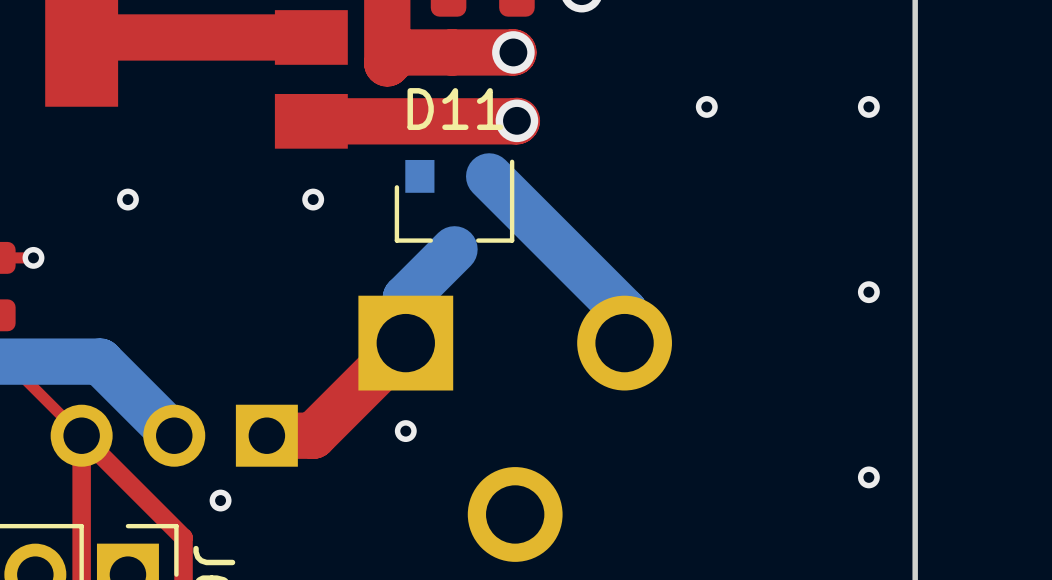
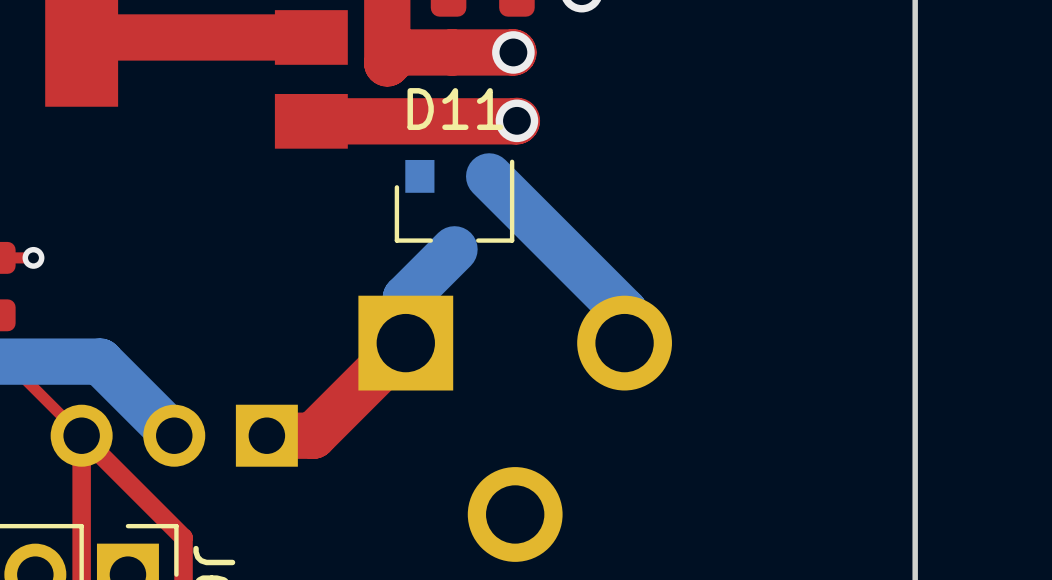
via: (706, 106) -> none
via: (868, 106) -> none
via: (127, 199) -> none
via: (313, 199) -> none
via: (868, 292) -> none
via: (405, 431) -> none
via: (868, 477) -> none
via: (220, 500) -> none

